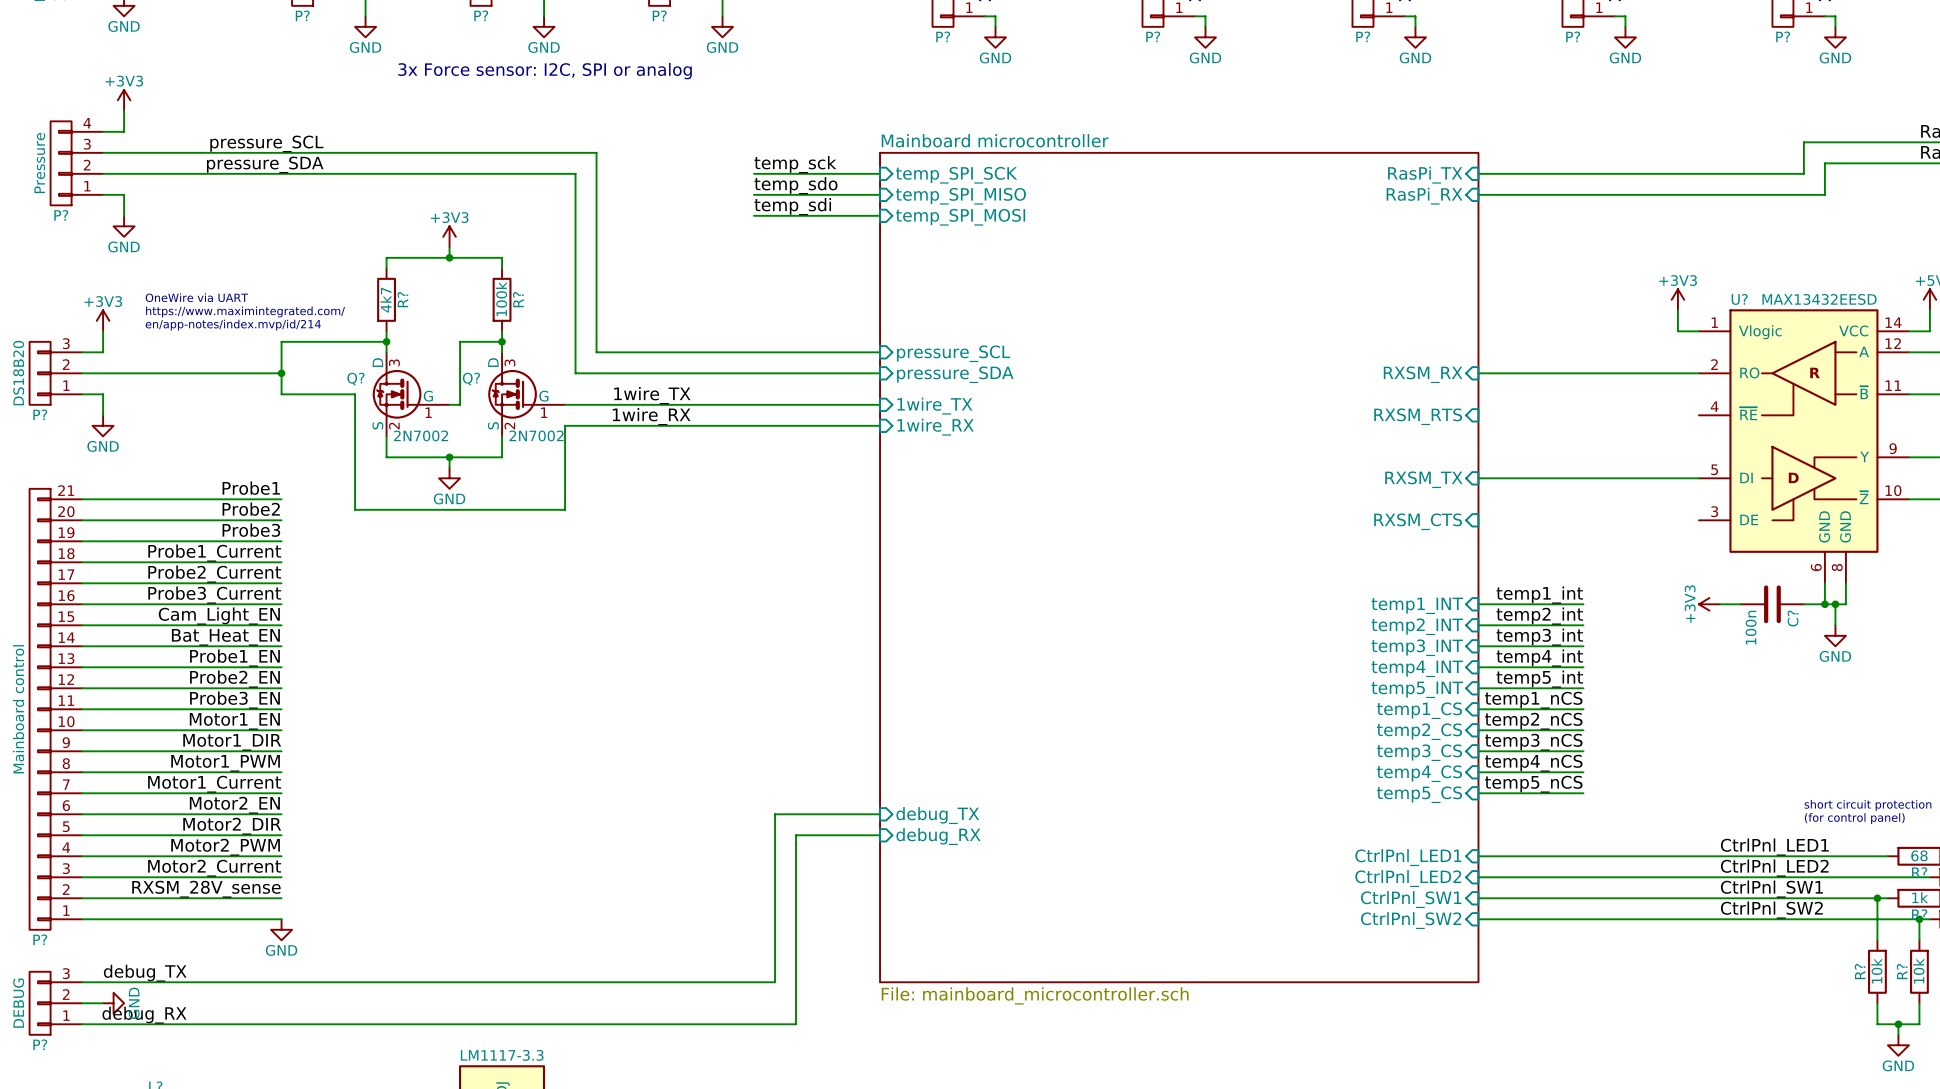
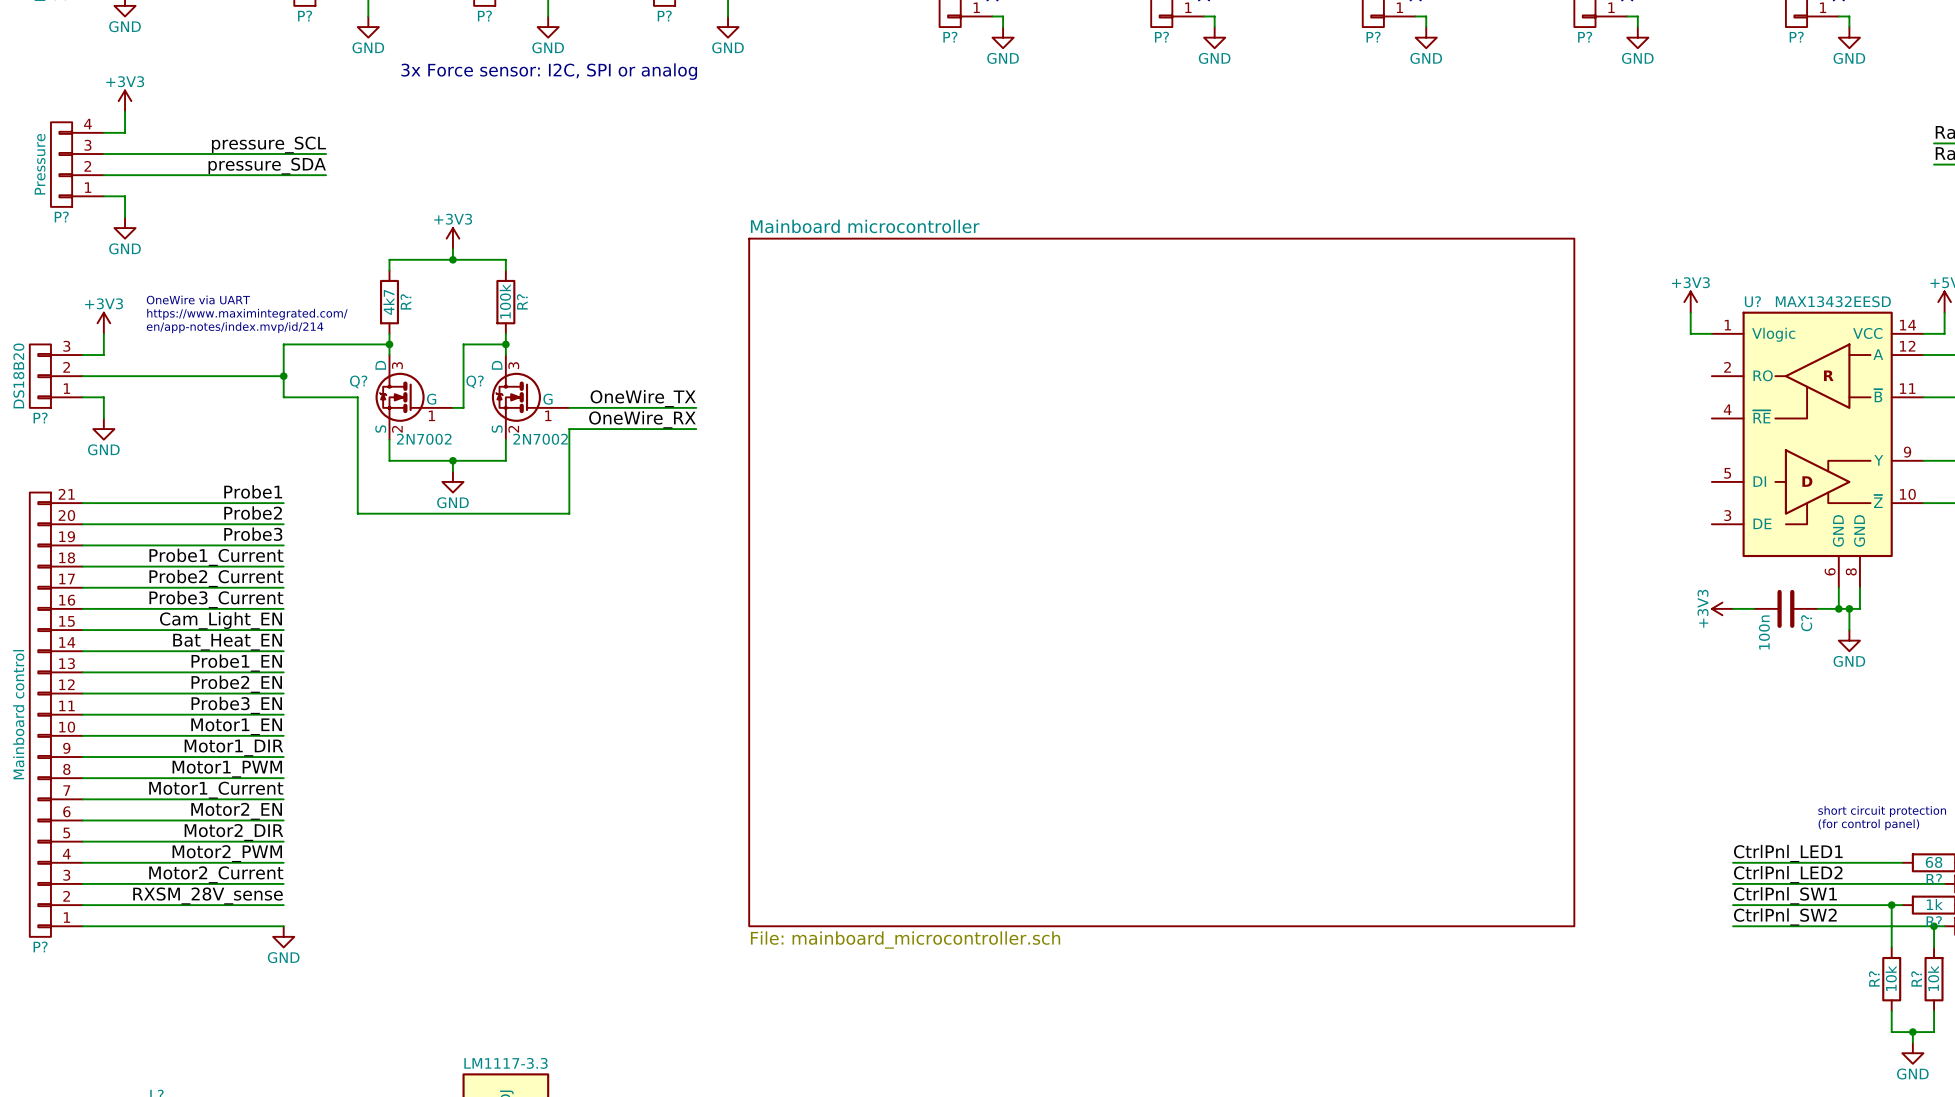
wire: (1919, 142) (1803, 142) (1803, 173) (1478, 173) -> none
wire: (323, 152) (596, 152) (596, 352) (880, 352) -> none
wire: (1919, 163) (1824, 163) (1824, 194) (1478, 194) -> none
label: temp_sck (795, 164) -> none
wire: (323, 173) (575, 173) (575, 373) (880, 373) -> none
wire: (754, 173) (880, 173) -> none
sheet pin: temp_SPI_SCK (956, 175) -> none
sheet pin: RasPi_TX (1425, 175) -> none
label: temp_sdo (795, 185) -> none
wire: (754, 194) (880, 194) -> none
sheet pin: temp_SPI_MISO (960, 196) -> none
sheet pin: RasPi_RX (1424, 196) -> none
label: temp_sdi (792, 206) -> none
wire: (754, 215) (880, 215) -> none
sheet pin: temp_SPI_MOSI (960, 217) -> none
sheet pin: pressure_SCL (953, 353) -> none
wire: (1478, 373) (1698, 373) -> none
sheet pin: pressure_SDA (955, 374) -> none
sheet pin: RXSM_RX (1423, 374) -> none
label: 1wire_TX (652, 395) -> OneWire_TX (643, 398)
wire: (691, 404) (880, 404) -> none
sheet pin: 1wire_TX (934, 406) -> none
label: 1wire_RX (651, 416) -> OneWire_RX (642, 419)
sheet pin: RXSM_RTS (1418, 416) -> none
wire: (691, 425) (880, 425) -> none
sheet pin: 1wire_RX (935, 427) -> none
wire: (1478, 478) (1698, 478) -> none
sheet pin: RXSM_TX (1423, 479) -> none
sheet pin: RXSM_CTS (1418, 521) -> none
sheet Mainboard microcontroller: File: mainboard_microcontroller.sch (1179, 567) -> none
sheet Mainboard microcontroller: none -> File: mainboard_microcontroller.sch (1161, 582)
label: temp1_int (1539, 595) -> none
wire: (1478, 604) (1583, 604) -> none
sheet pin: temp1_INT (1417, 605) -> none
label: temp2_int (1539, 616) -> none
wire: (1478, 625) (1583, 625) -> none
sheet pin: temp2_INT (1417, 626) -> none
label: temp3_int (1539, 637) -> none
wire: (1478, 646) (1583, 646) -> none
sheet pin: temp3_INT (1417, 647) -> none
label: temp4_int (1539, 658) -> none
wire: (1478, 667) (1583, 667) -> none
sheet pin: temp4_INT (1417, 668) -> none
label: temp5_int (1539, 679) -> none
wire: (1478, 688) (1583, 688) -> none
sheet pin: temp5_INT (1417, 689) -> none
label: temp1_nCS (1533, 700) -> none
wire: (1478, 709) (1583, 709) -> none
sheet pin: temp1_CS (1419, 710) -> none
label: temp2_nCS (1533, 721) -> none
wire: (1478, 730) (1583, 730) -> none
sheet pin: temp2_CS (1419, 731) -> none
label: temp3_nCS (1533, 742) -> none
wire: (1478, 751) (1583, 751) -> none
sheet pin: temp3_CS (1419, 752) -> none
label: temp4_nCS (1533, 763) -> none
wire: (1478, 772) (1583, 772) -> none
sheet pin: temp4_CS (1419, 773) -> none
label: temp5_nCS (1533, 784) -> none
wire: (1478, 793) (1583, 793) -> none
sheet pin: temp5_CS (1419, 794) -> none
wire: (880, 814) (775, 814) (775, 982) (82, 982) -> none
sheet pin: debug_TX (937, 815) -> none
wire: (880, 835) (796, 835) (796, 1024) (82, 1024) -> none
sheet pin: debug_RX (938, 836) -> none
wire: (1478, 856) (1719, 856) -> none
sheet pin: CtrlPnl_LED1 (1408, 857) -> none
wire: (1478, 877) (1719, 877) -> none
sheet pin: CtrlPnl_LED2 (1408, 878) -> none
wire: (1478, 898) (1719, 898) -> none
sheet pin: CtrlPnl_SW1 (1411, 899) -> none
wire: (1478, 919) (1719, 919) -> none
sheet pin: CtrlPnl_SW2 (1411, 920) -> none
label: debug_TX (145, 973) -> none
P?: DEBUG (55, 1003) -> none
wire: (82, 1003) (103, 1003) -> none
power symbol: GND (113, 1003) -> none
label: debug_RX (144, 1015) -> none

